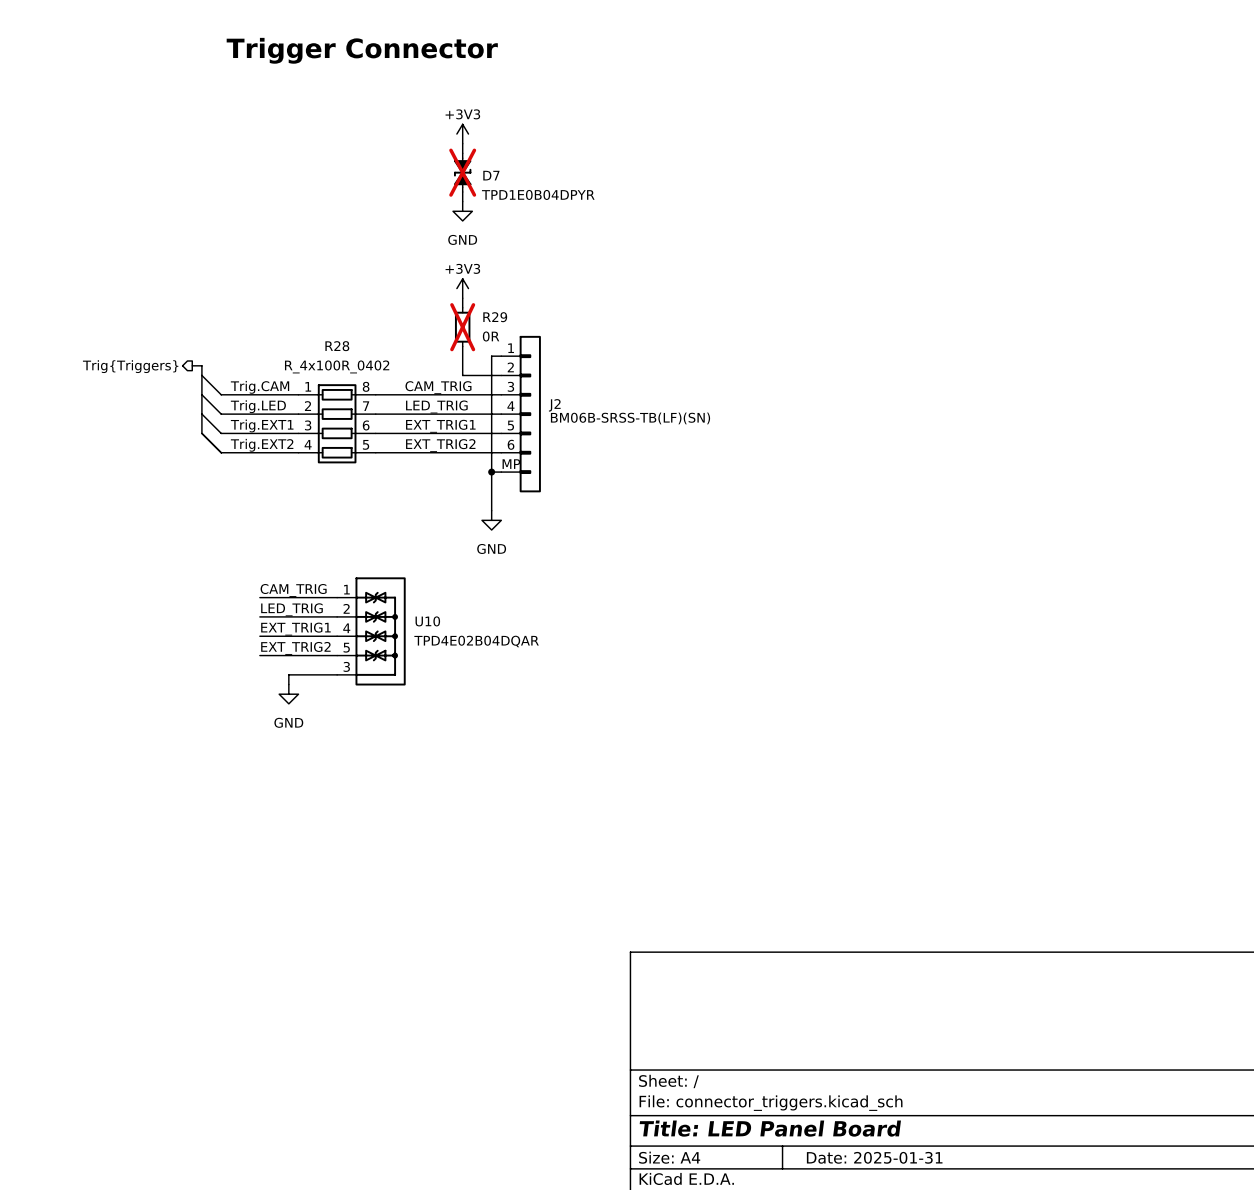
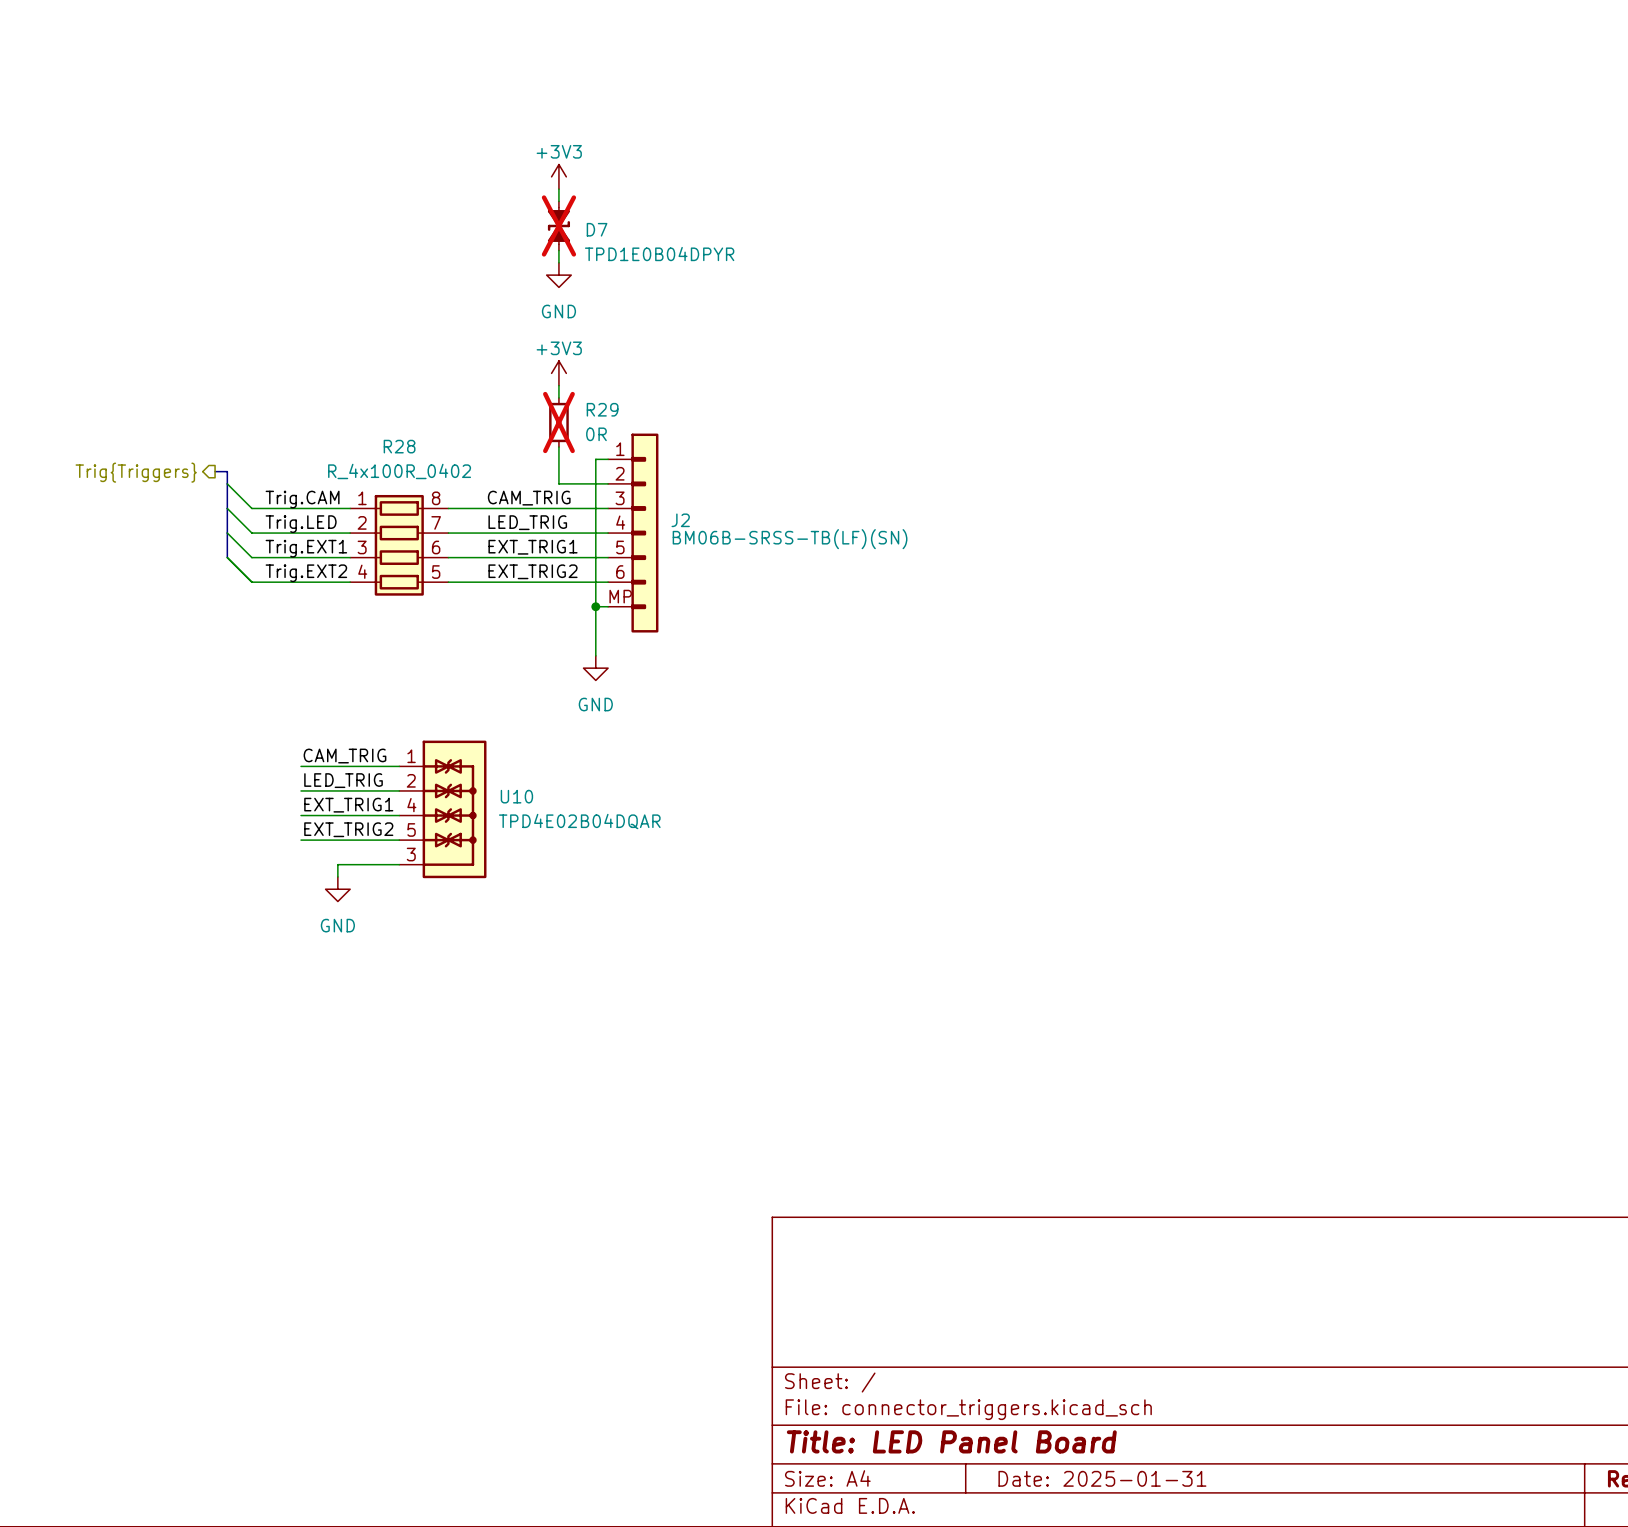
text: Trigger Connector (362, 50) -> none

